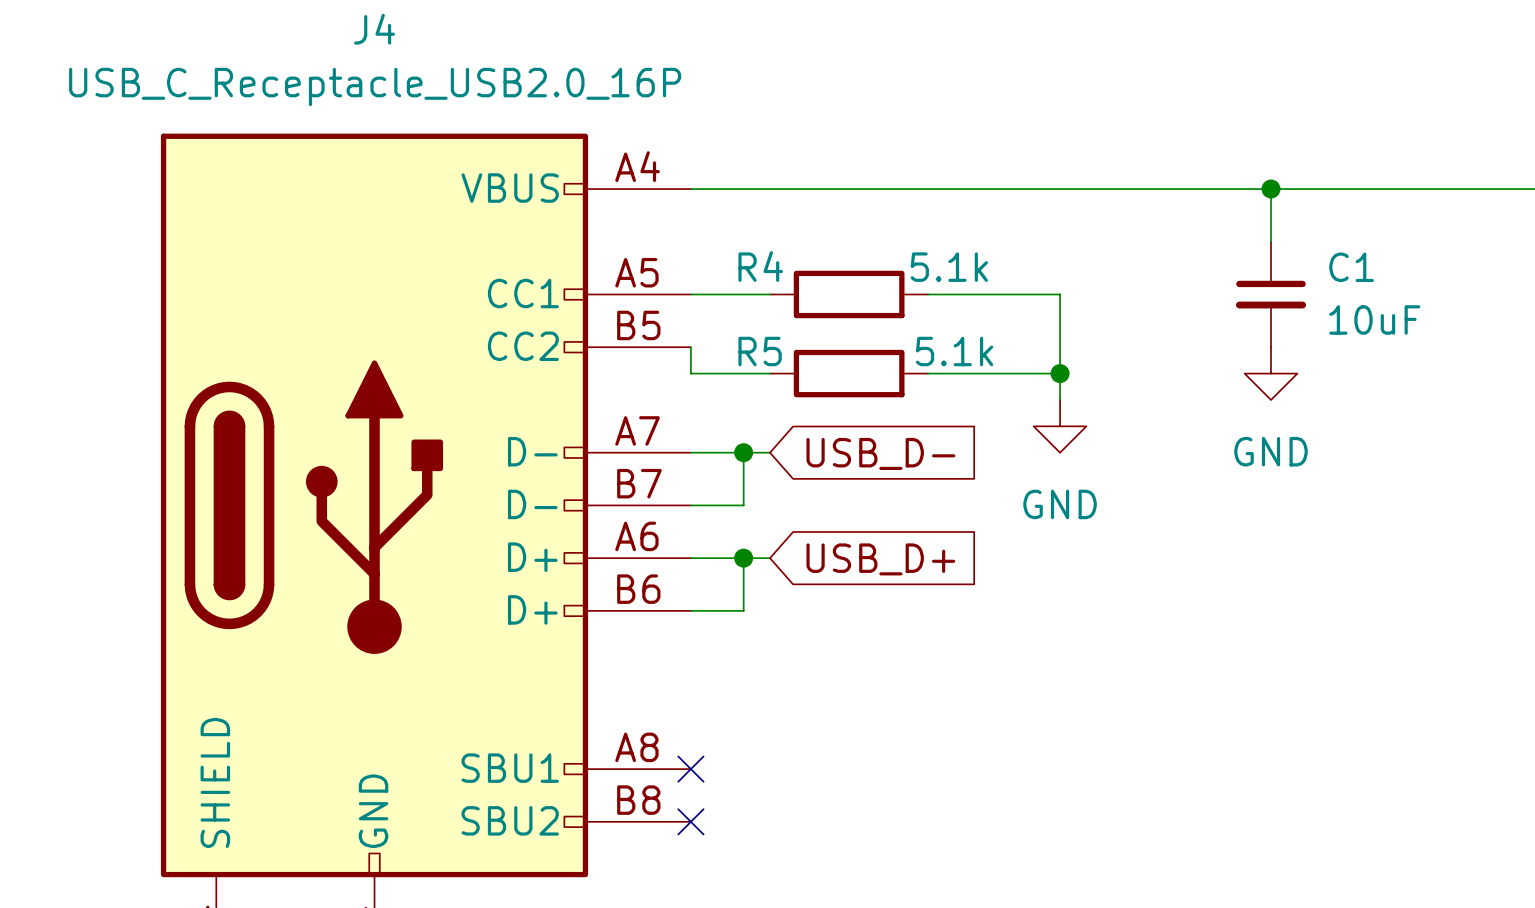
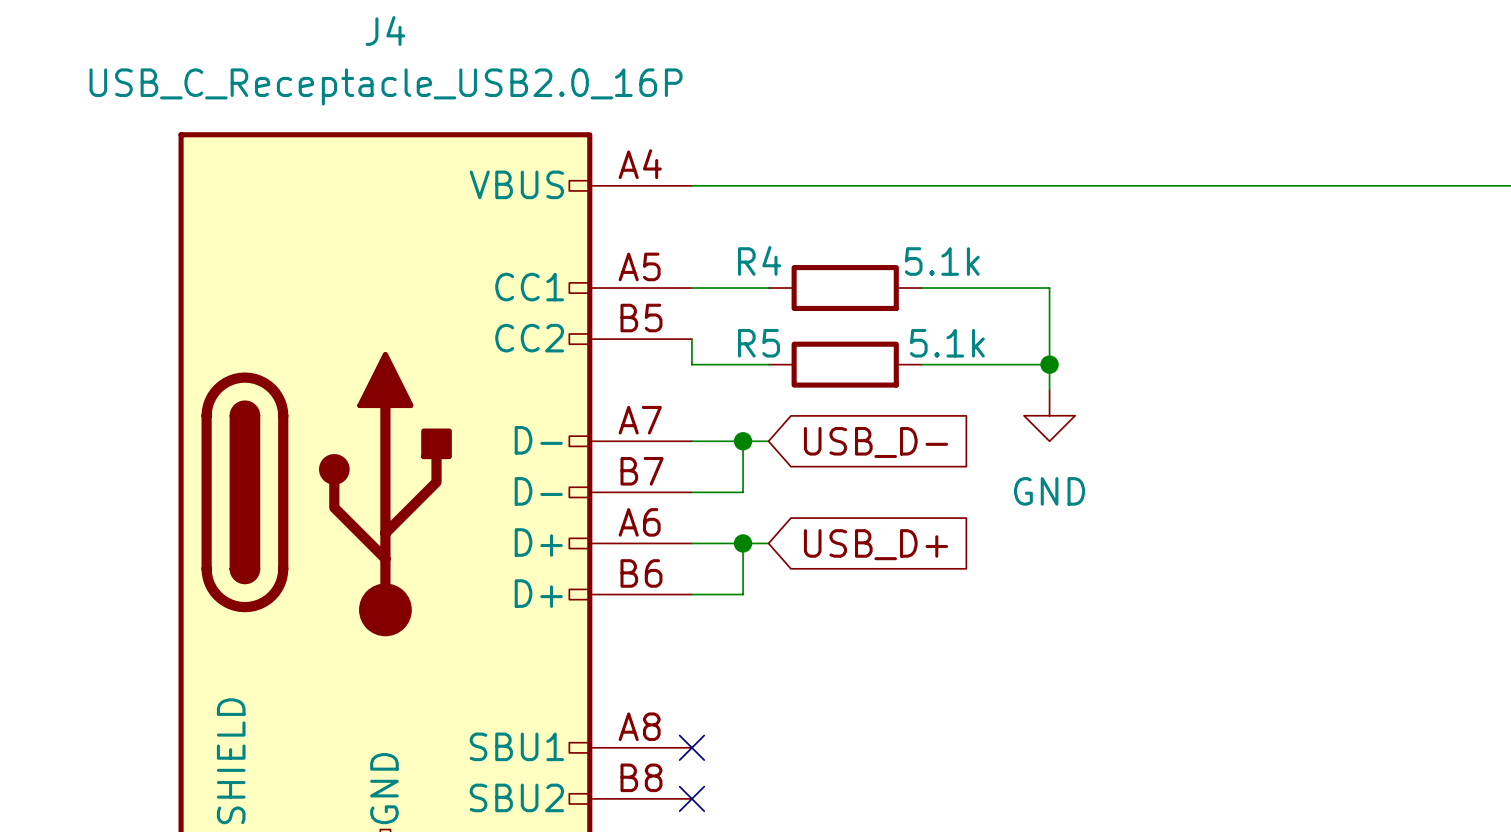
wire: (1271, 189) (1271, 241) -> none
junction: (1271, 189) -> none
C1: 10uF (1271, 294) -> none
power symbol: GND (1271, 373) -> none

